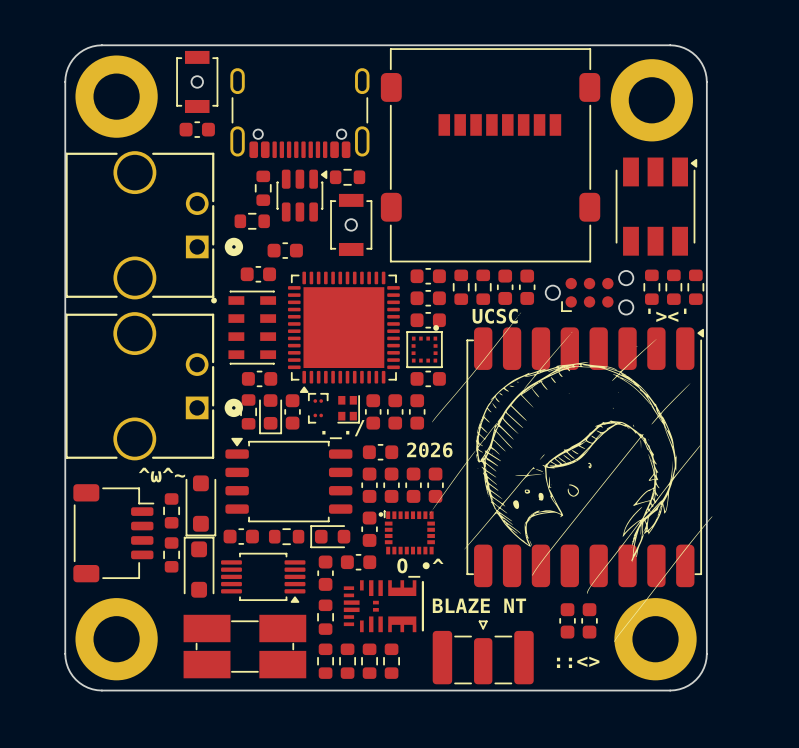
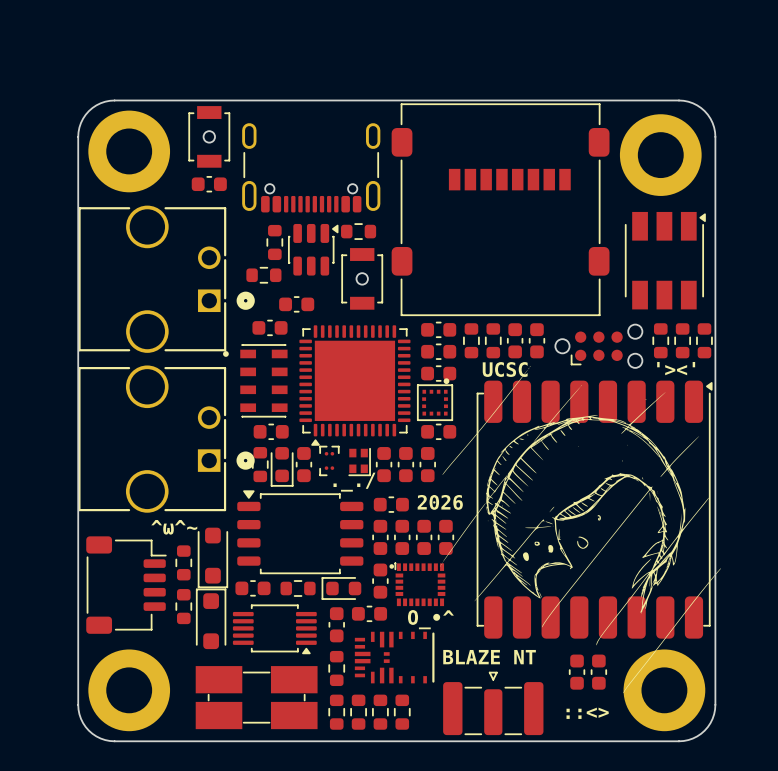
part footprint: [343, 580, 425, 633] -> [354, 631, 435, 684]

